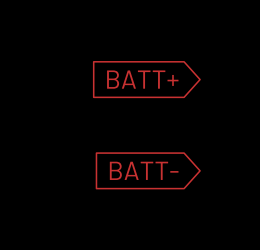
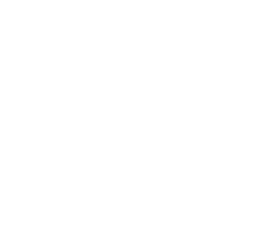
global label: BATT+ (142, 79) -> none
global label: BATT- (144, 170) -> none

